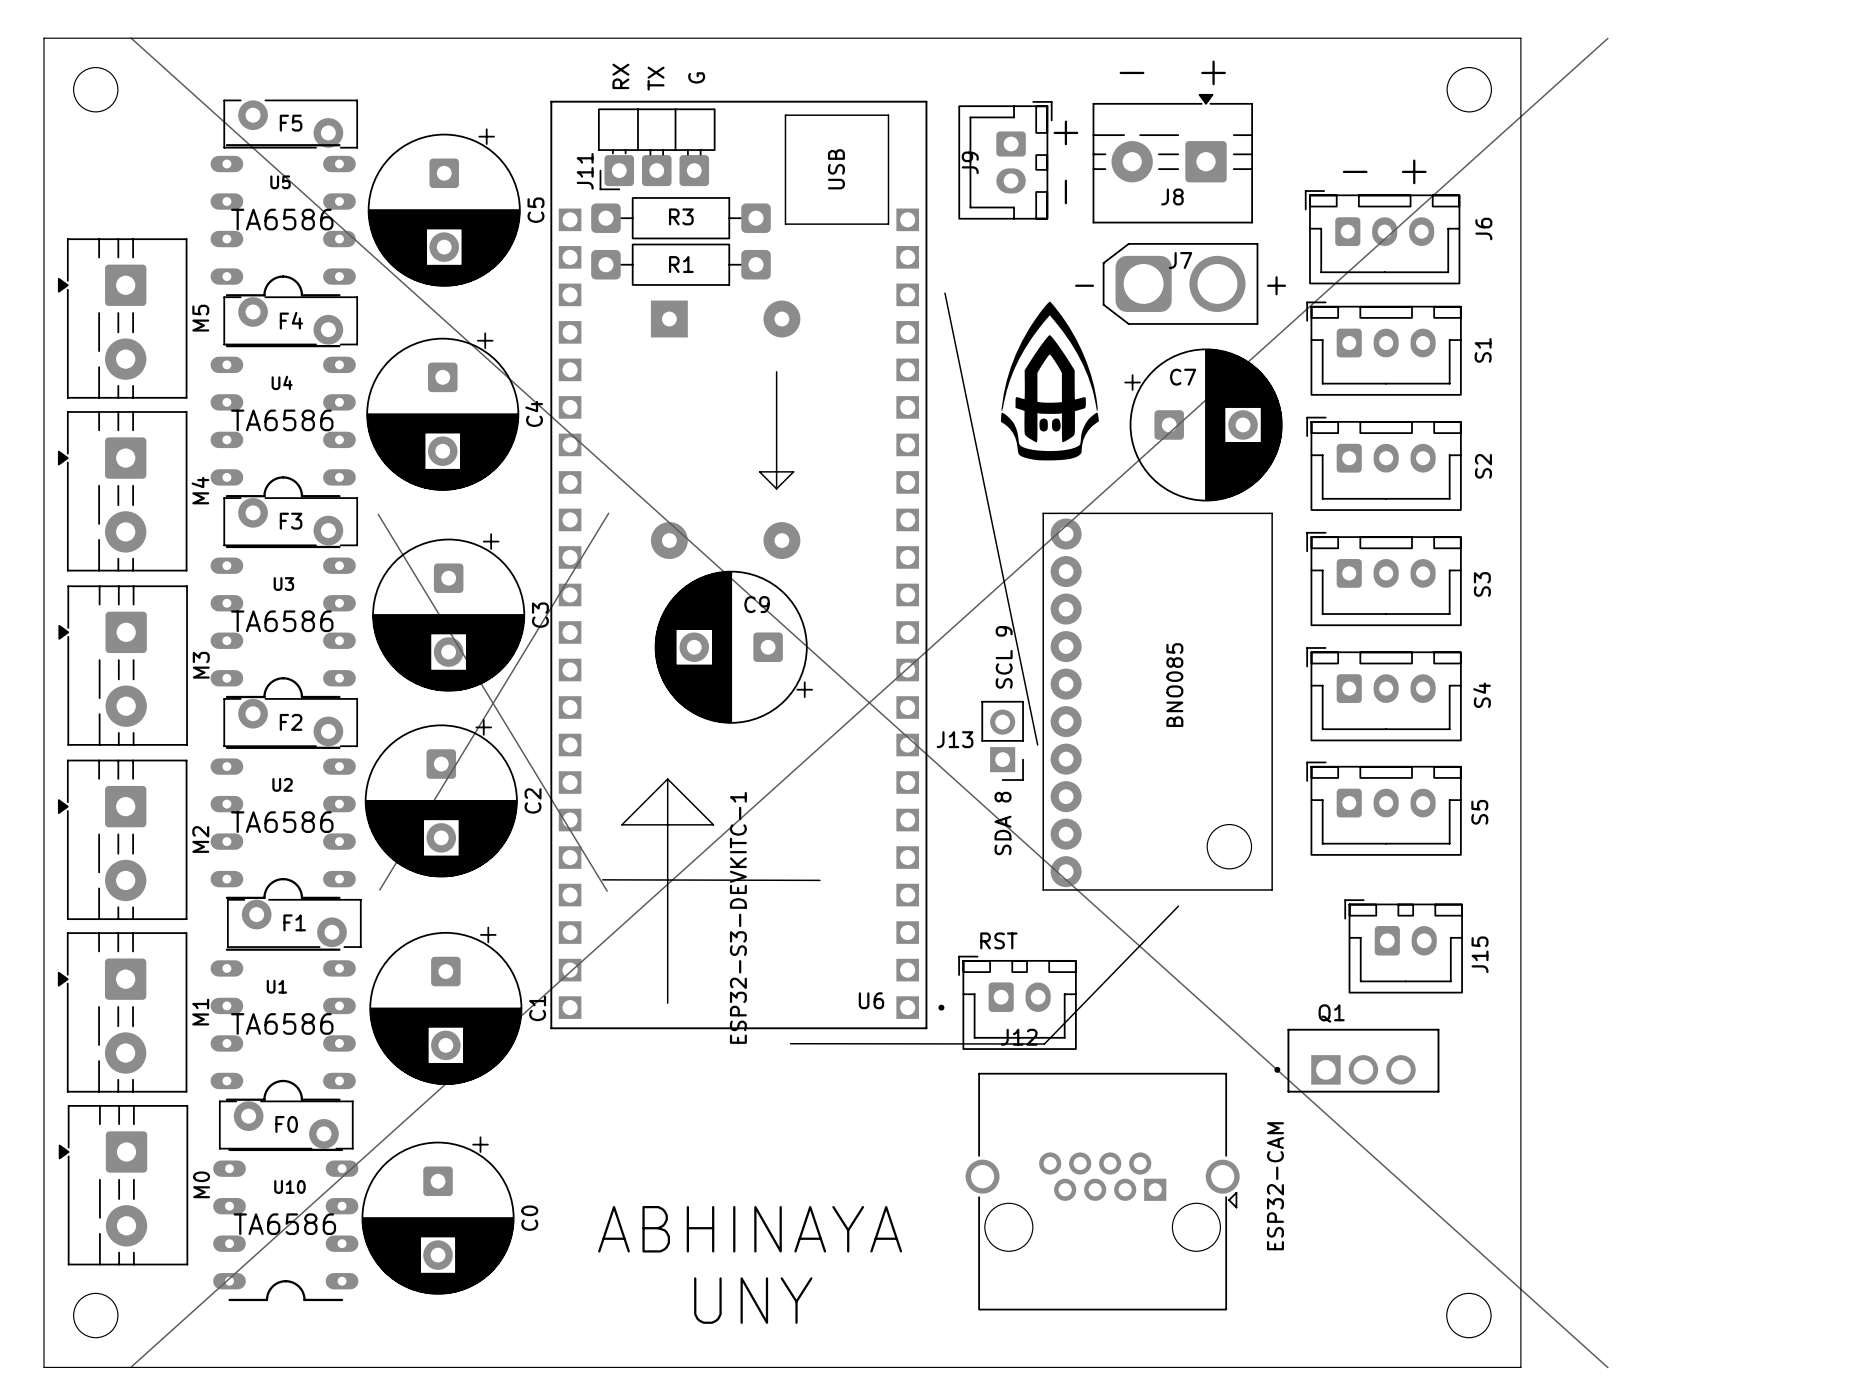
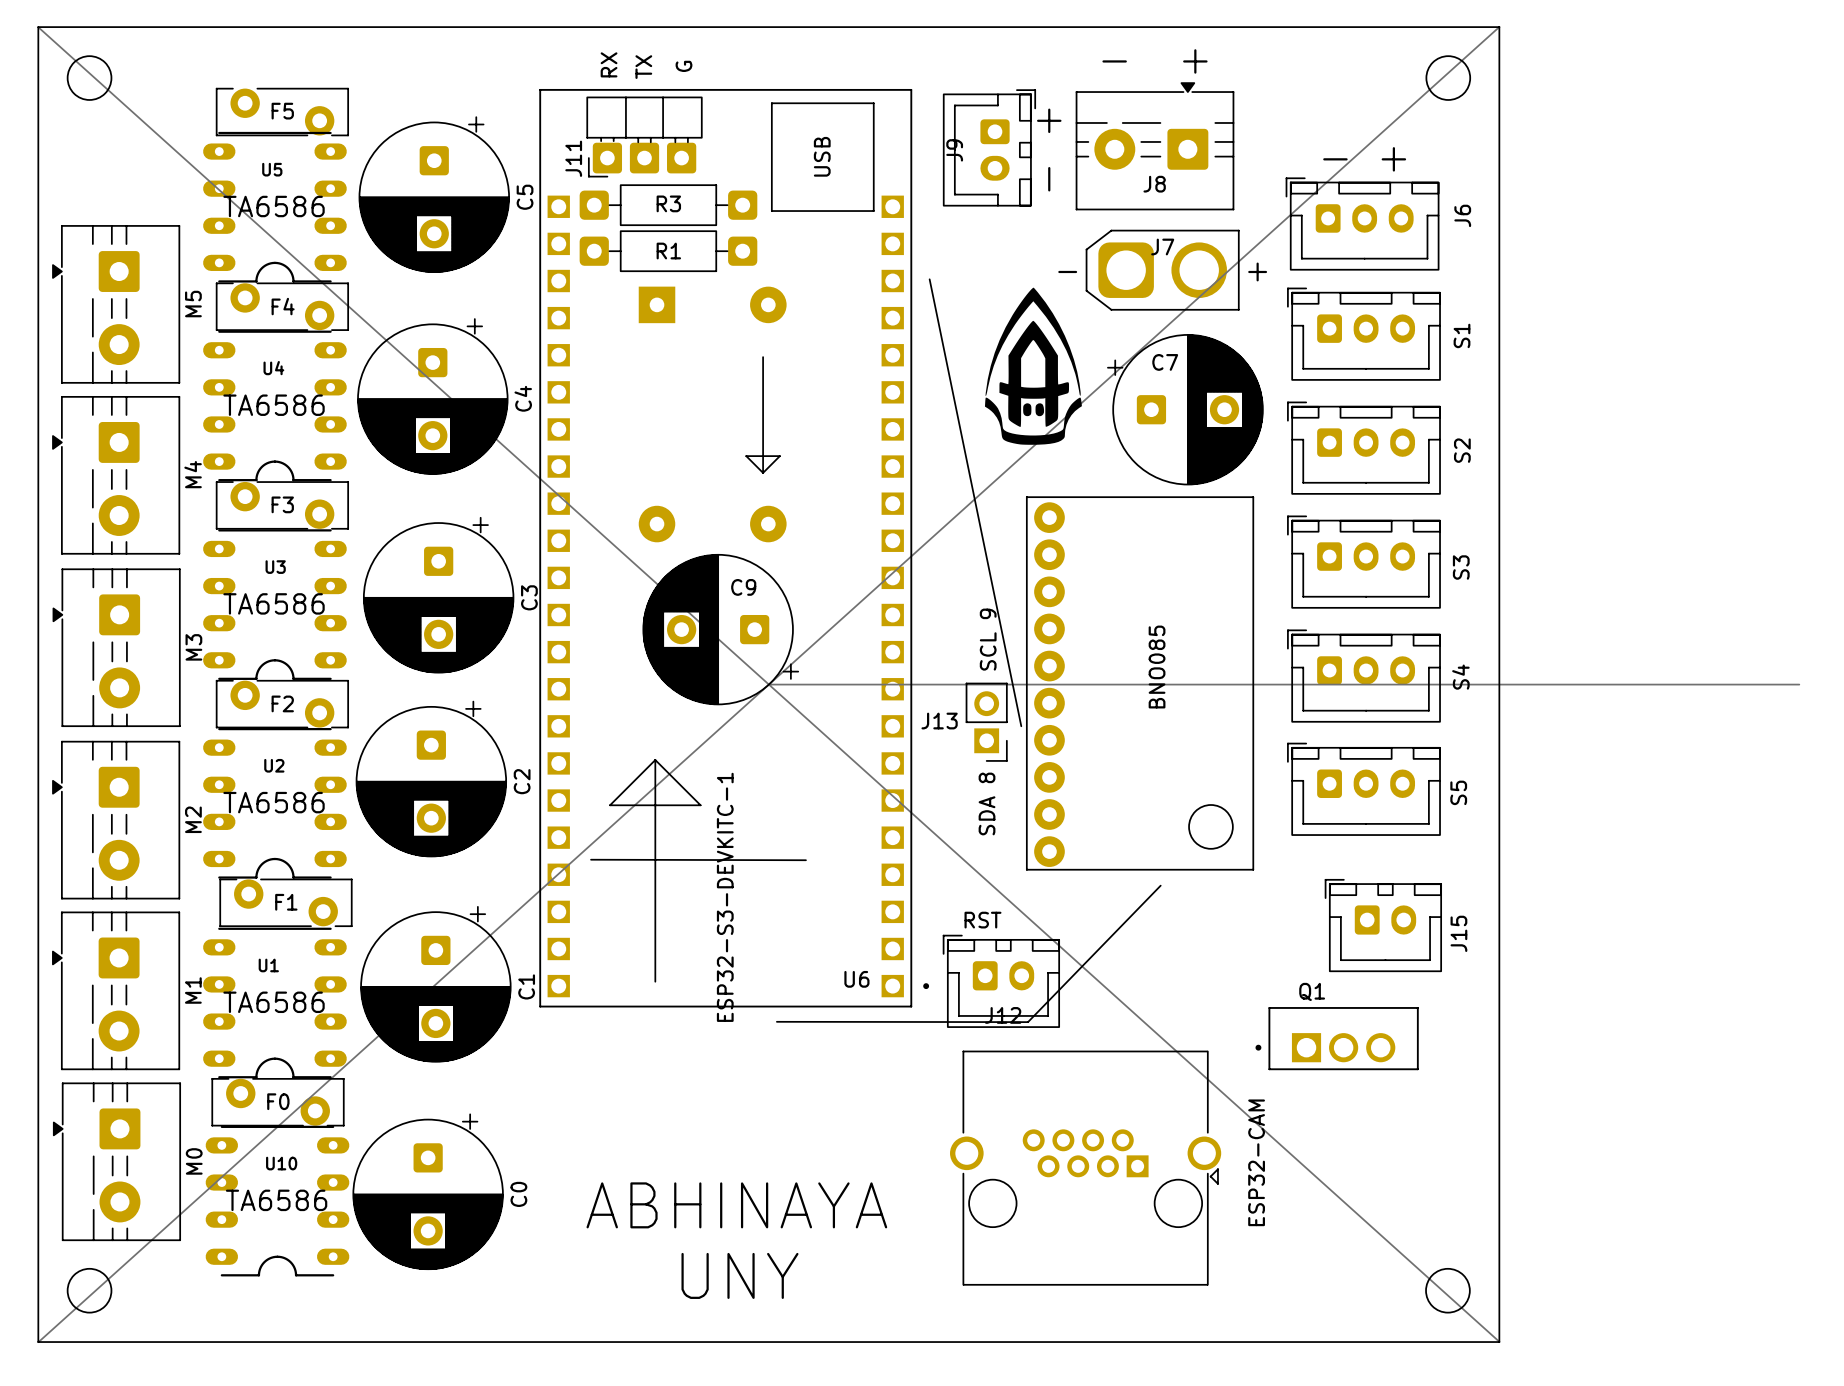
line: none -> (38, 27) (1499, 1341)
line: (130, 38) (1607, 1367) -> none
line: none -> (1499, 26) (38, 1342)
line: (1607, 38) (130, 1367) -> none
line: (608, 513) (379, 889) -> none
line: (378, 514) (607, 891) -> none
line: none -> (768, 684) (1799, 684)

